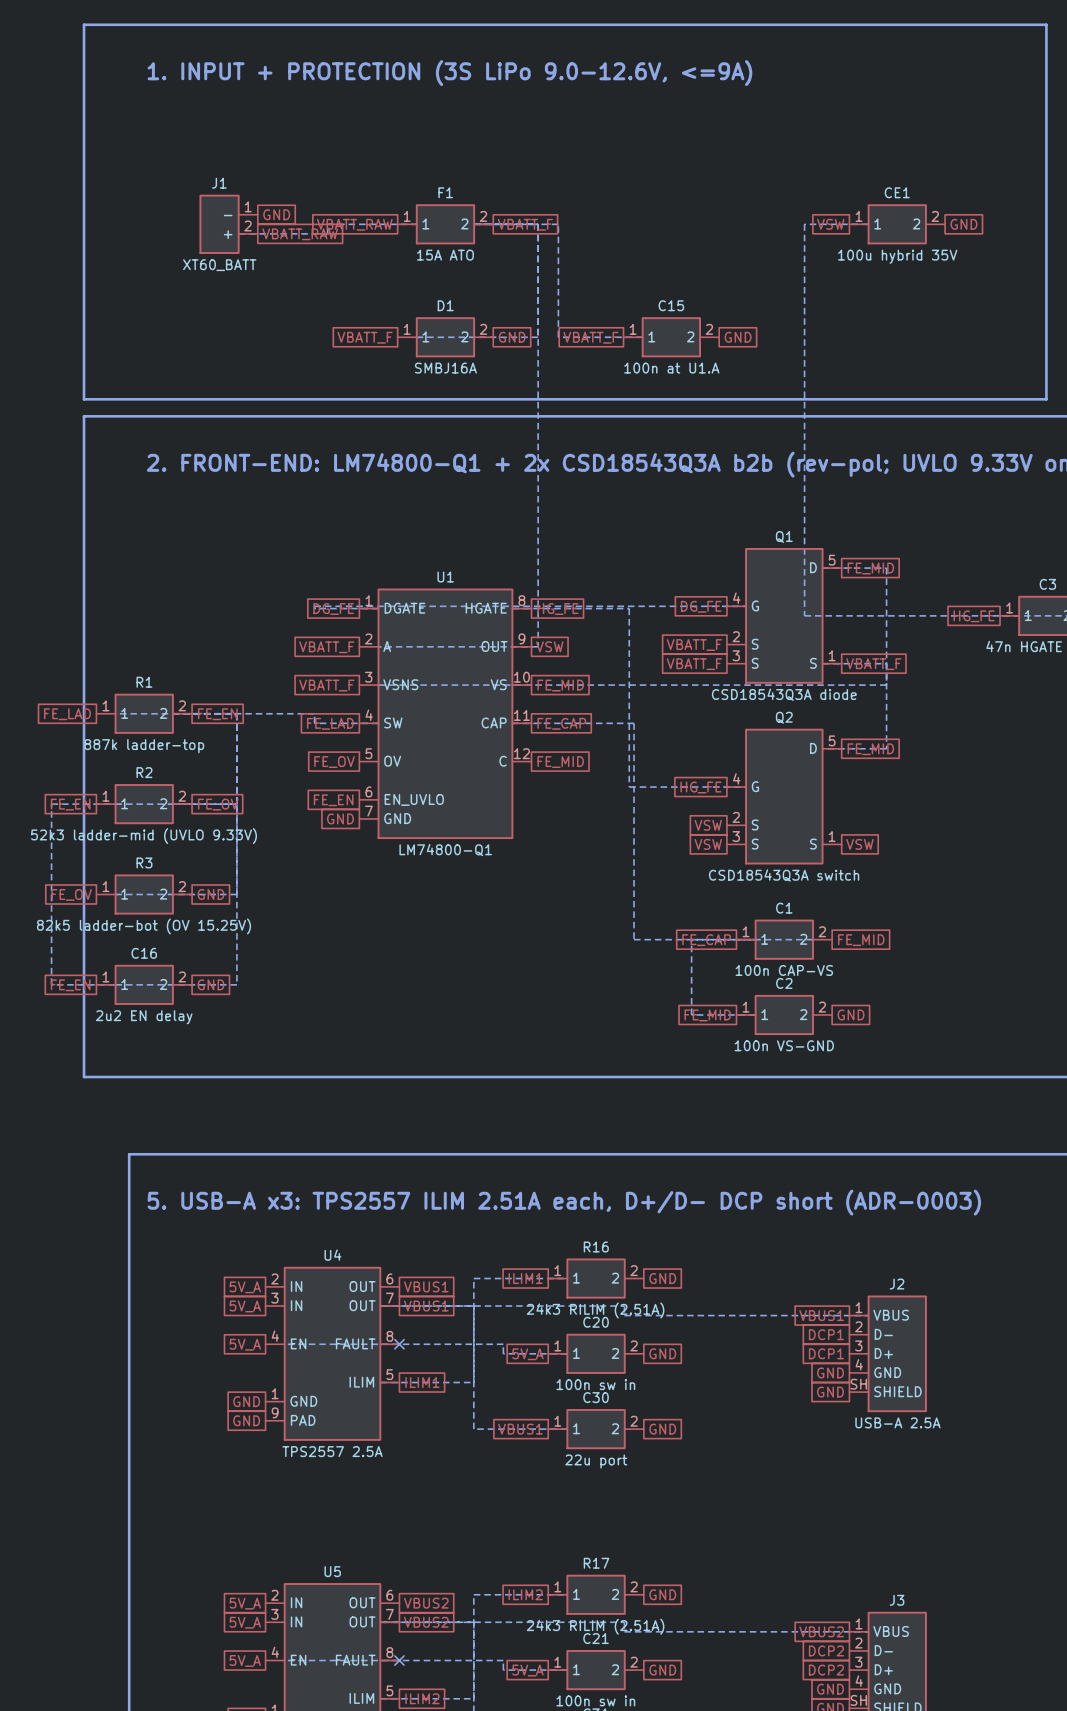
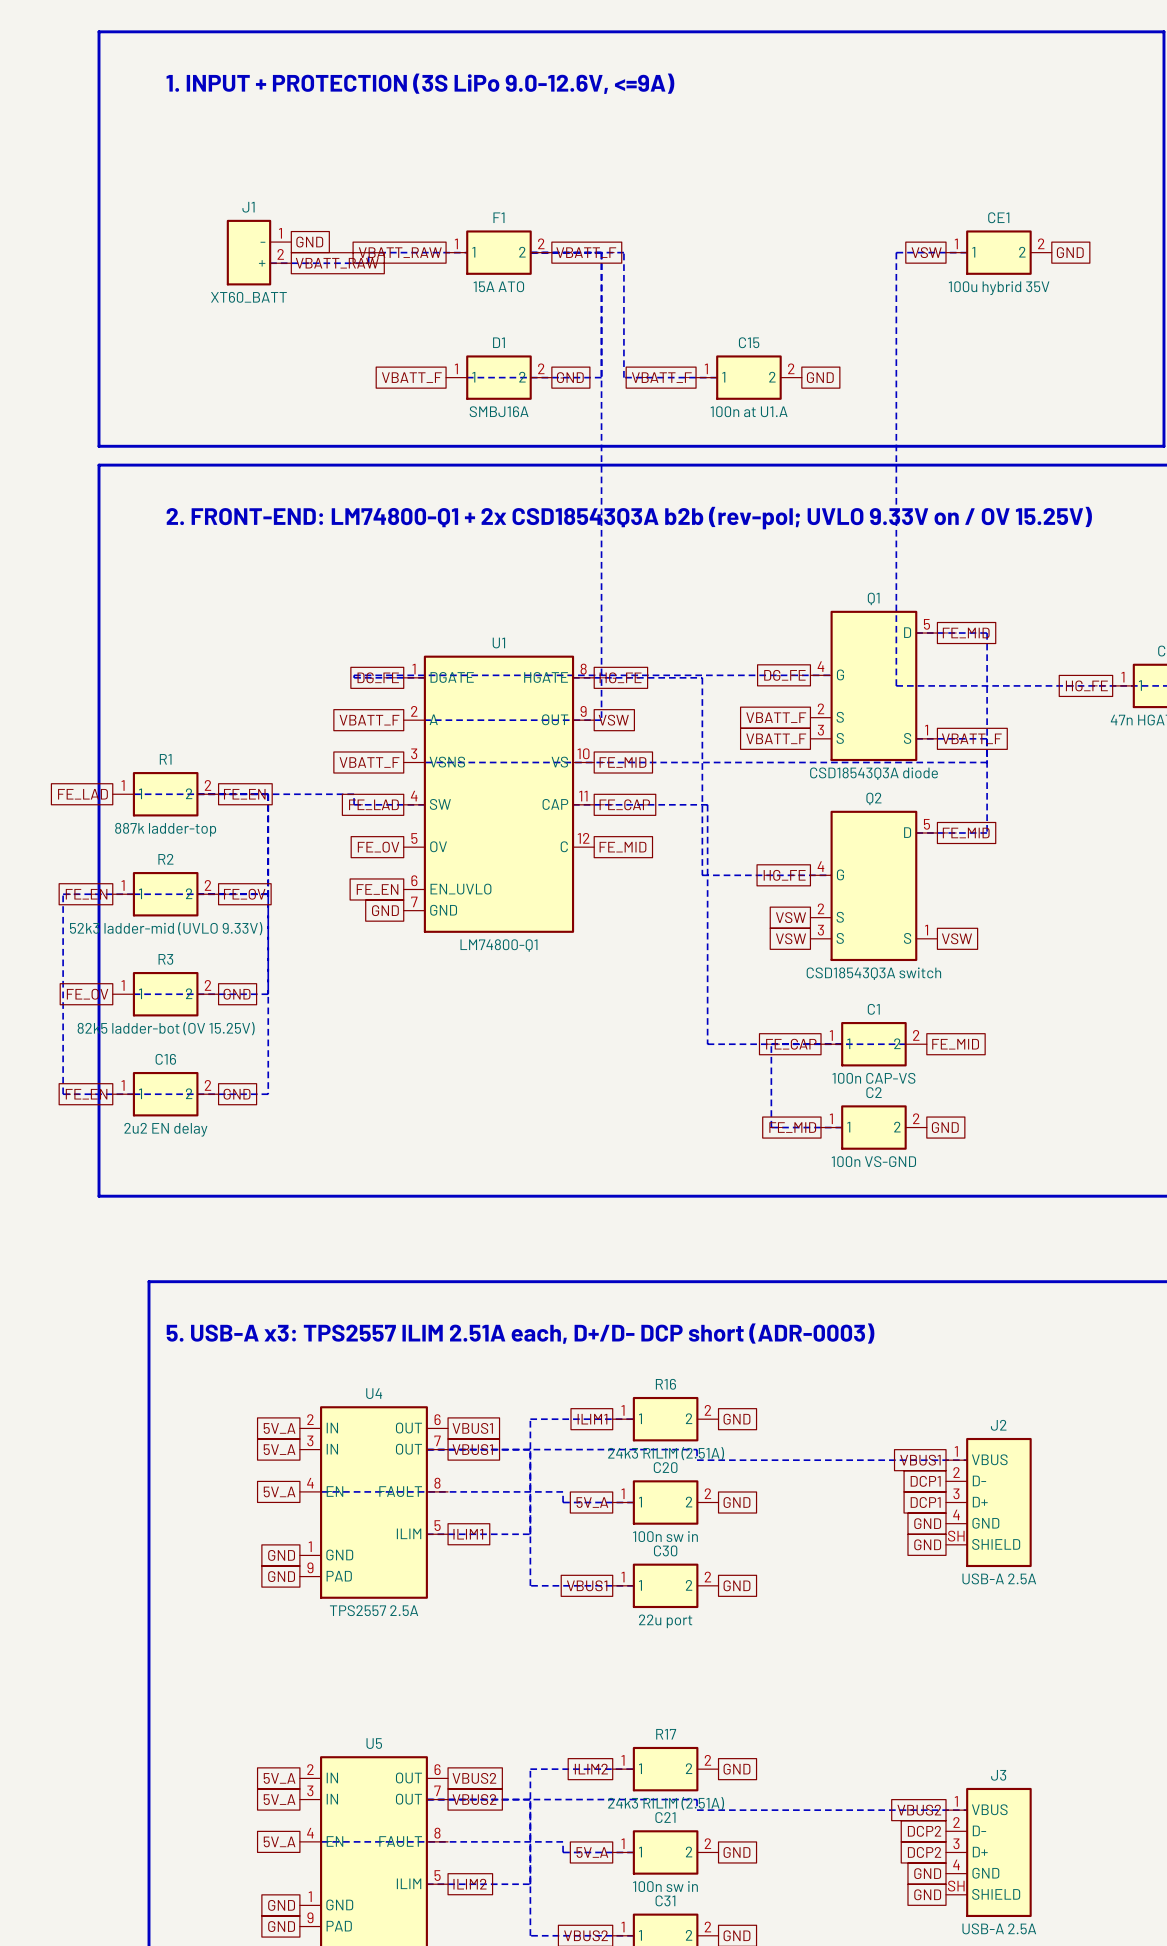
no-connect mark: (399, 1344) -> none
no-connect mark: (399, 1660) -> none

